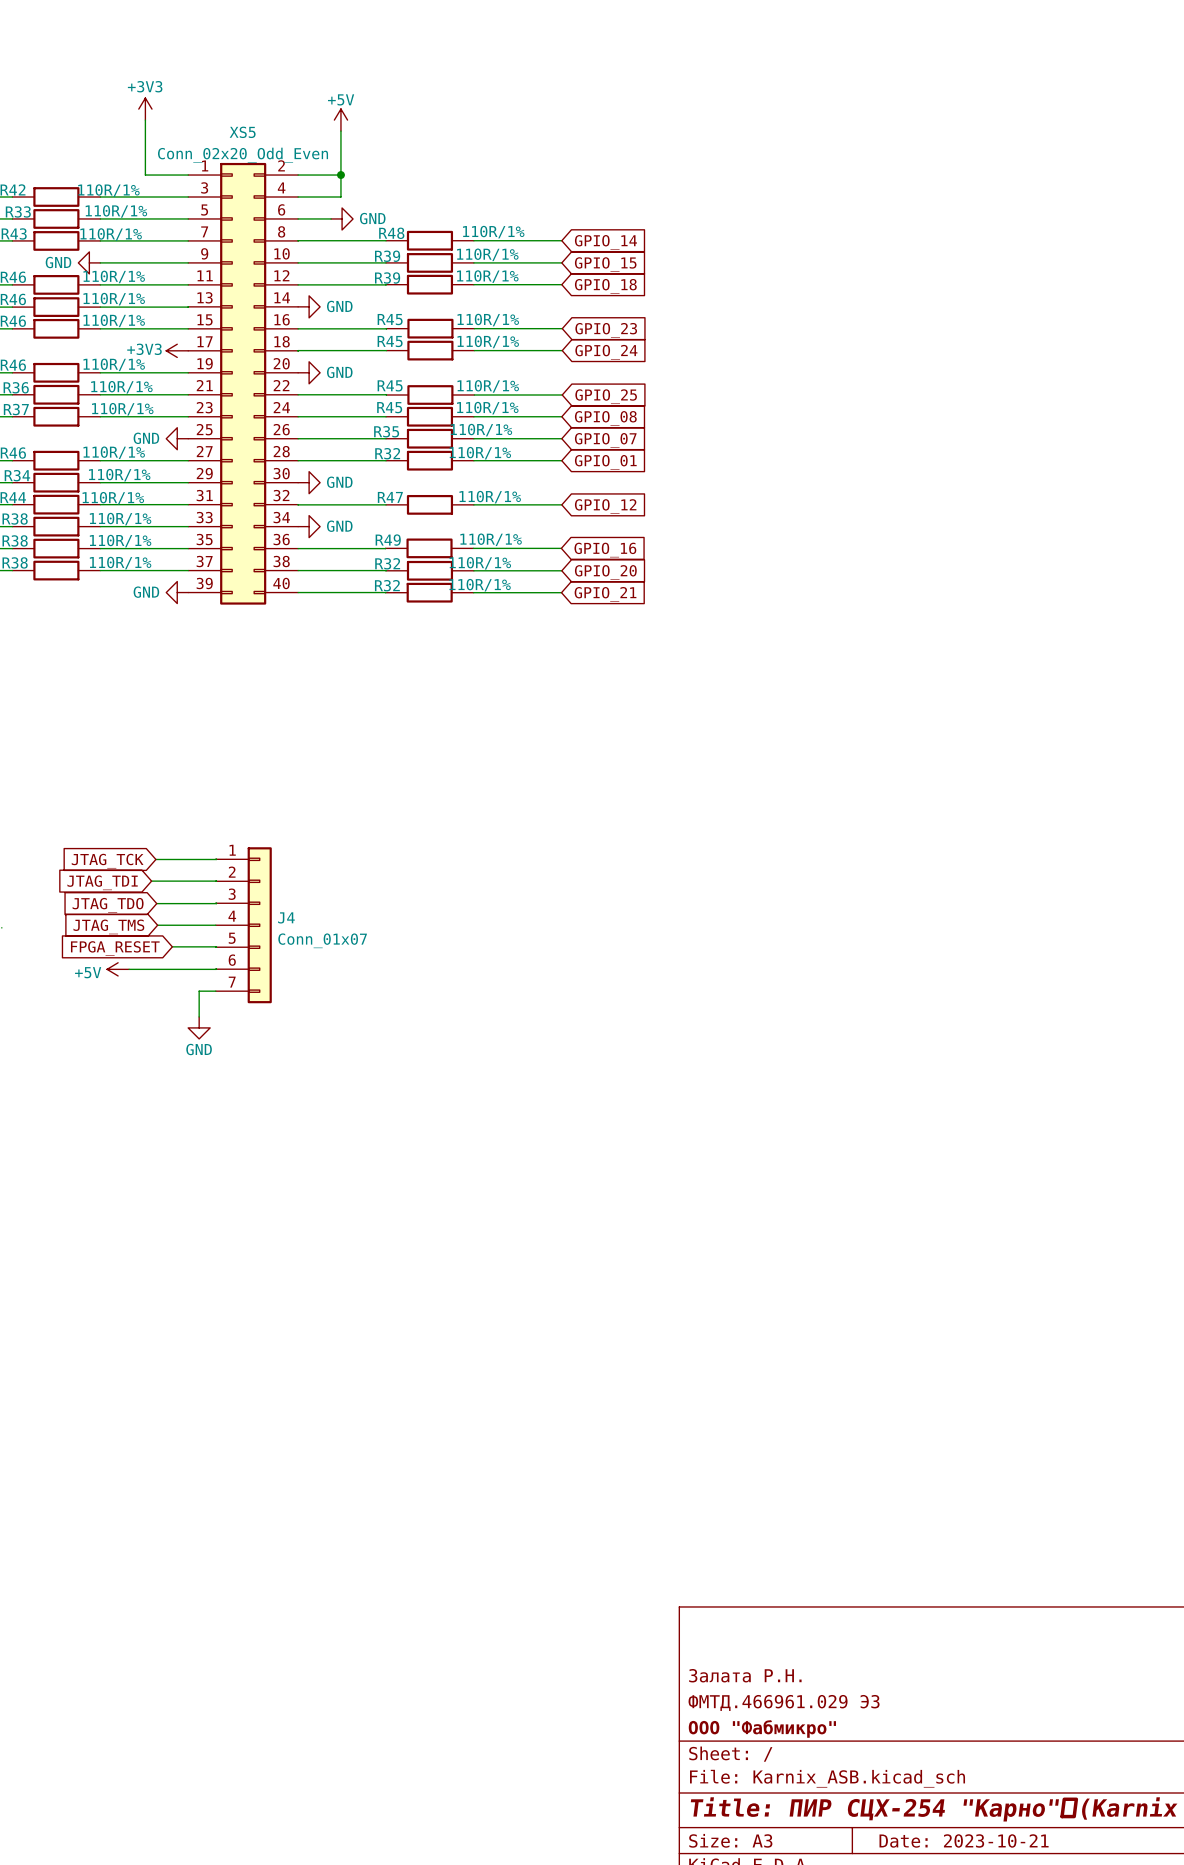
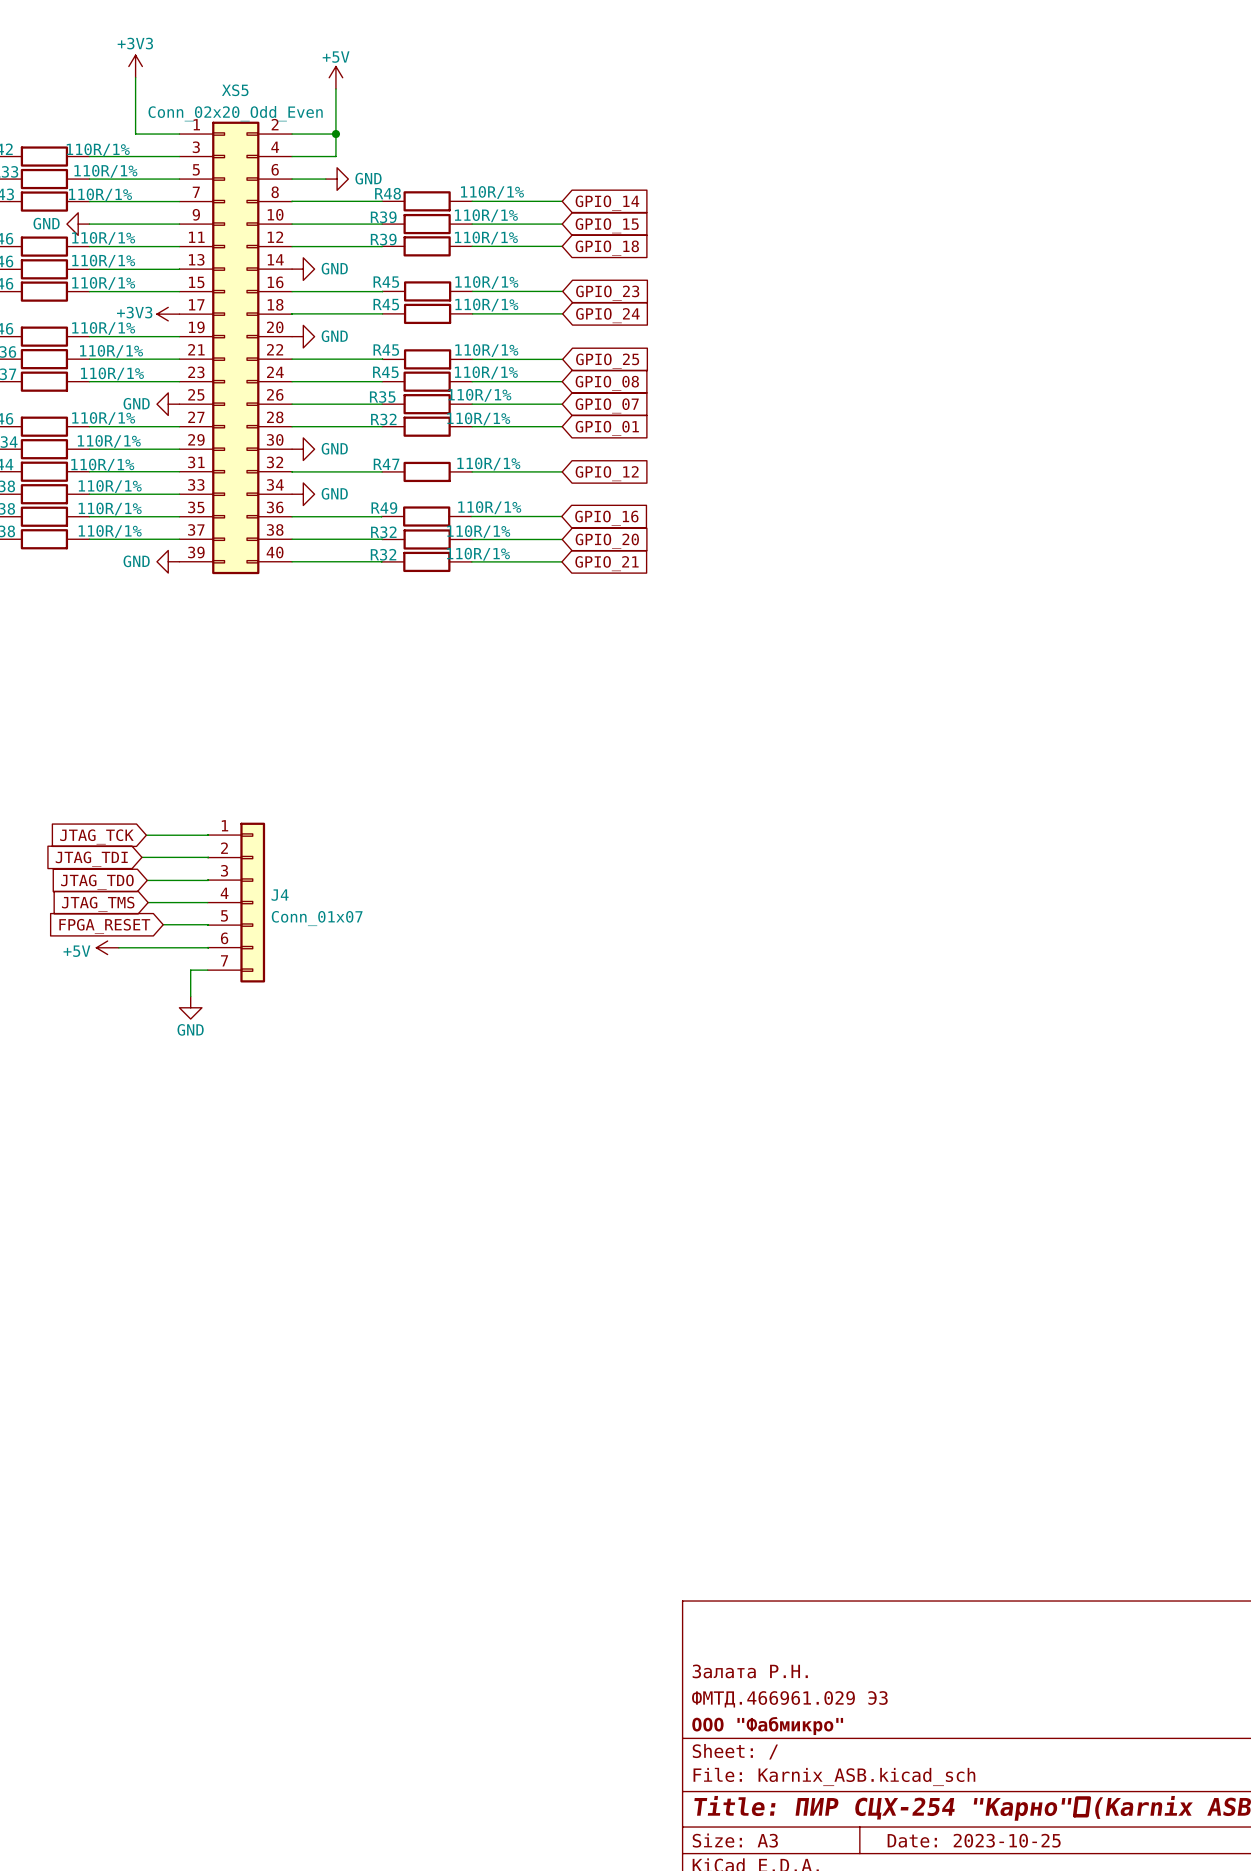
title block: Date: 2023-10-21 (964, 1840) -> Date: 2023-10-25 (974, 1840)

